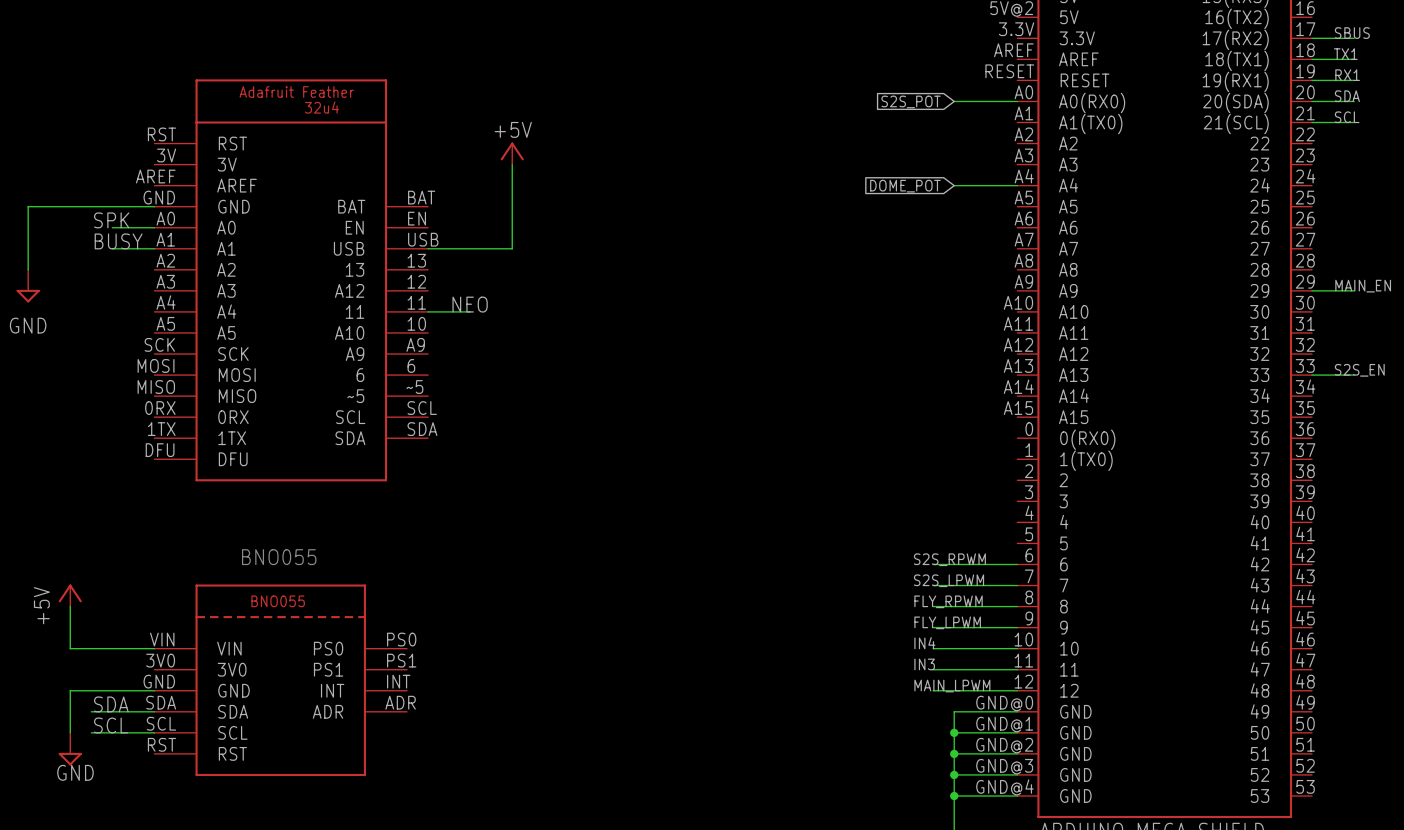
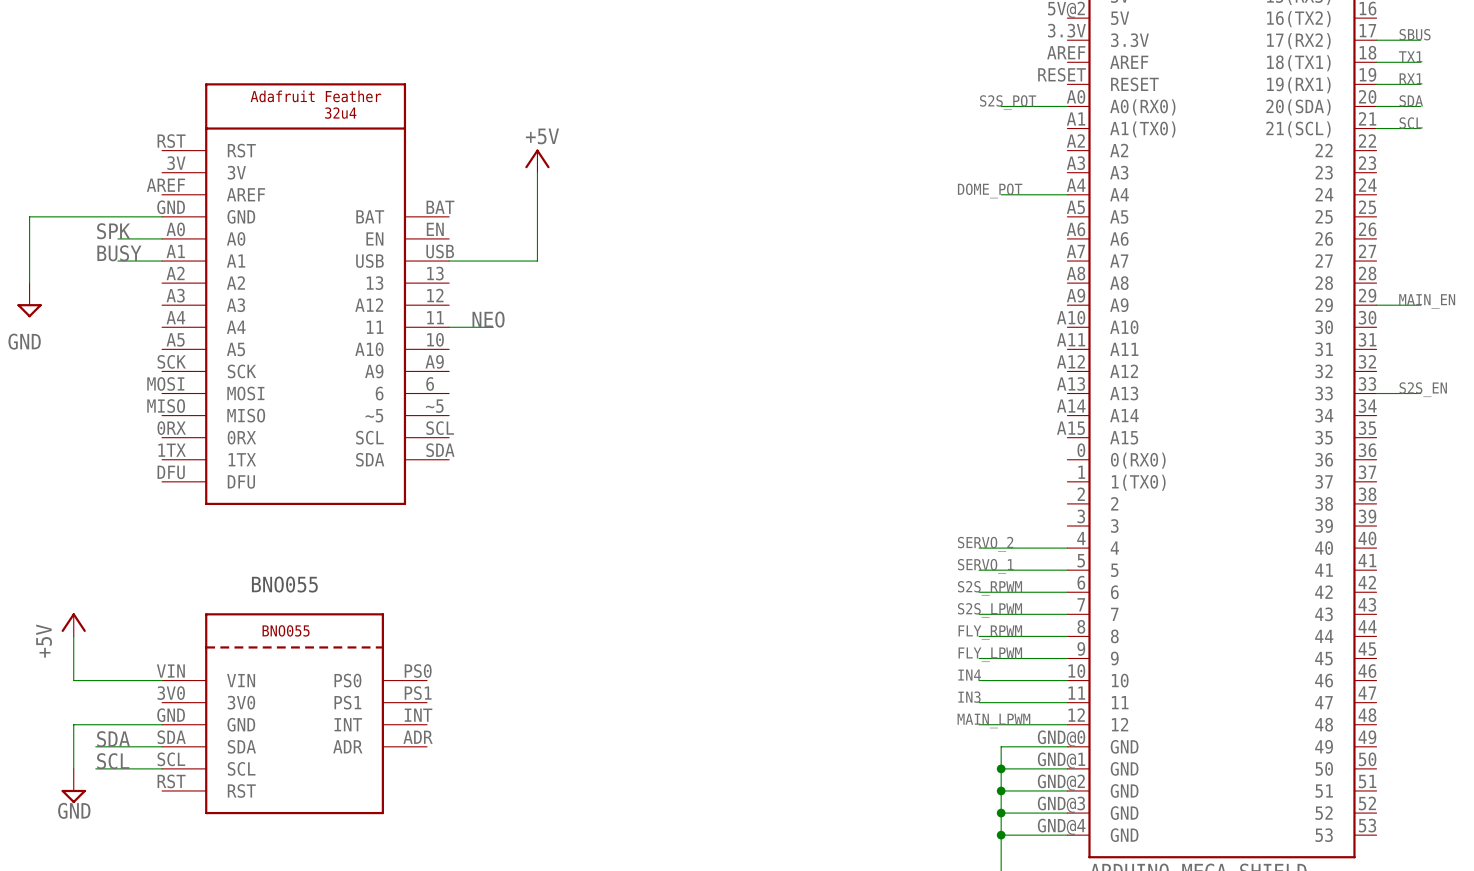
label: none -> S2S_POT (1008, 102)
global label: S2S_POT (911, 101) -> none
label: none -> DOME_POT (990, 190)
global label: DOME_POT (905, 186) -> none
label: none -> SERVO_2 (985, 544)
wire: none -> (979, 548) (1067, 548)
label: none -> SERVO_1 (985, 566)
wire: none -> (979, 570) (1067, 570)

